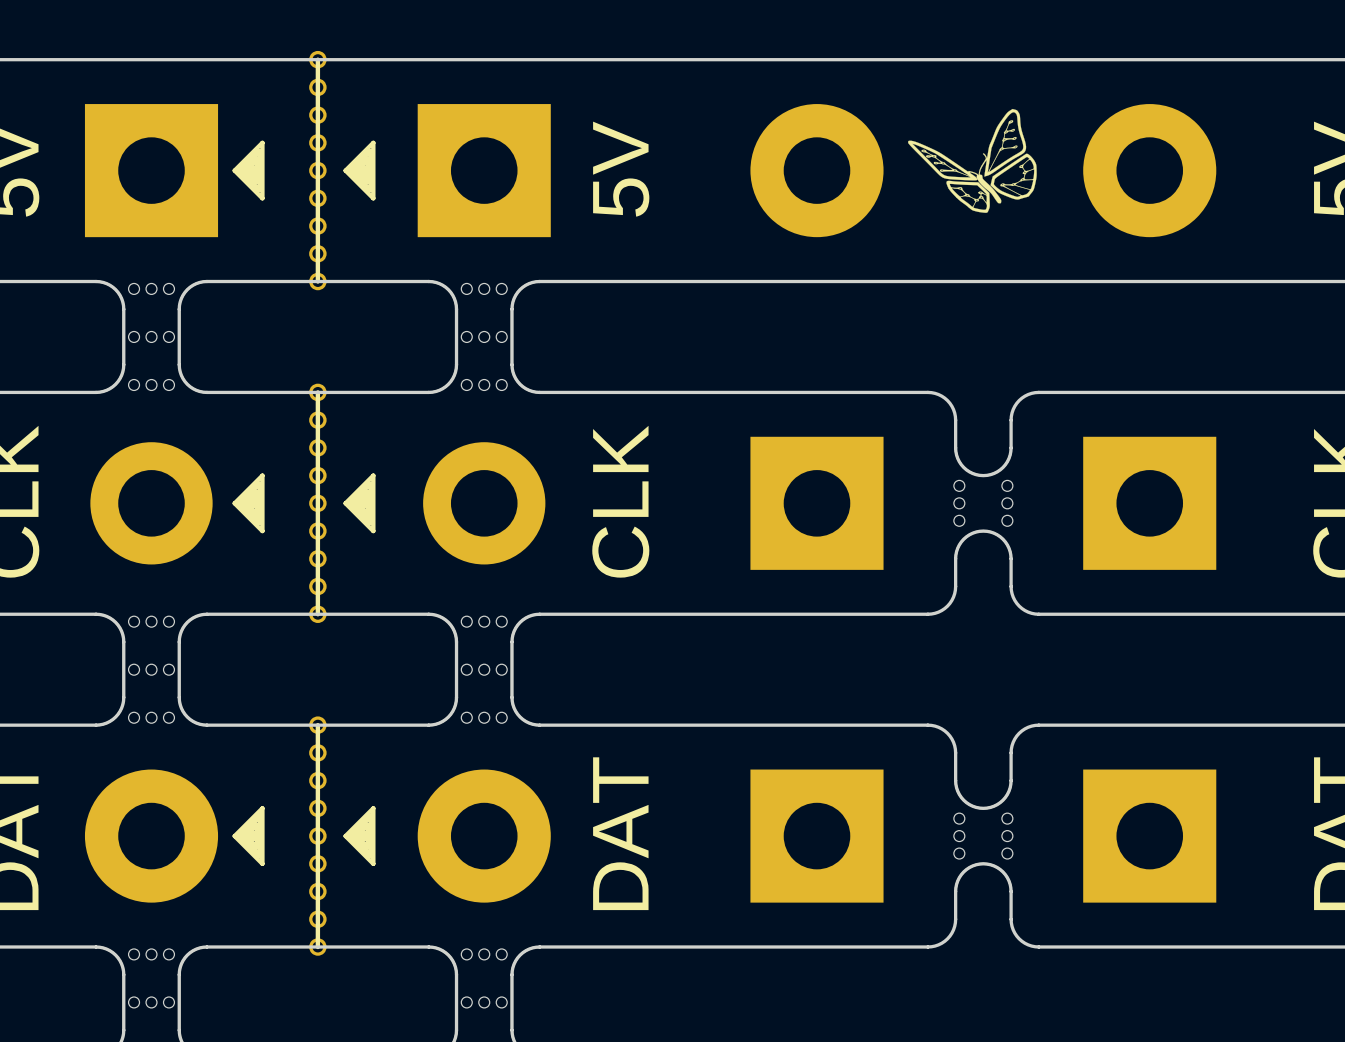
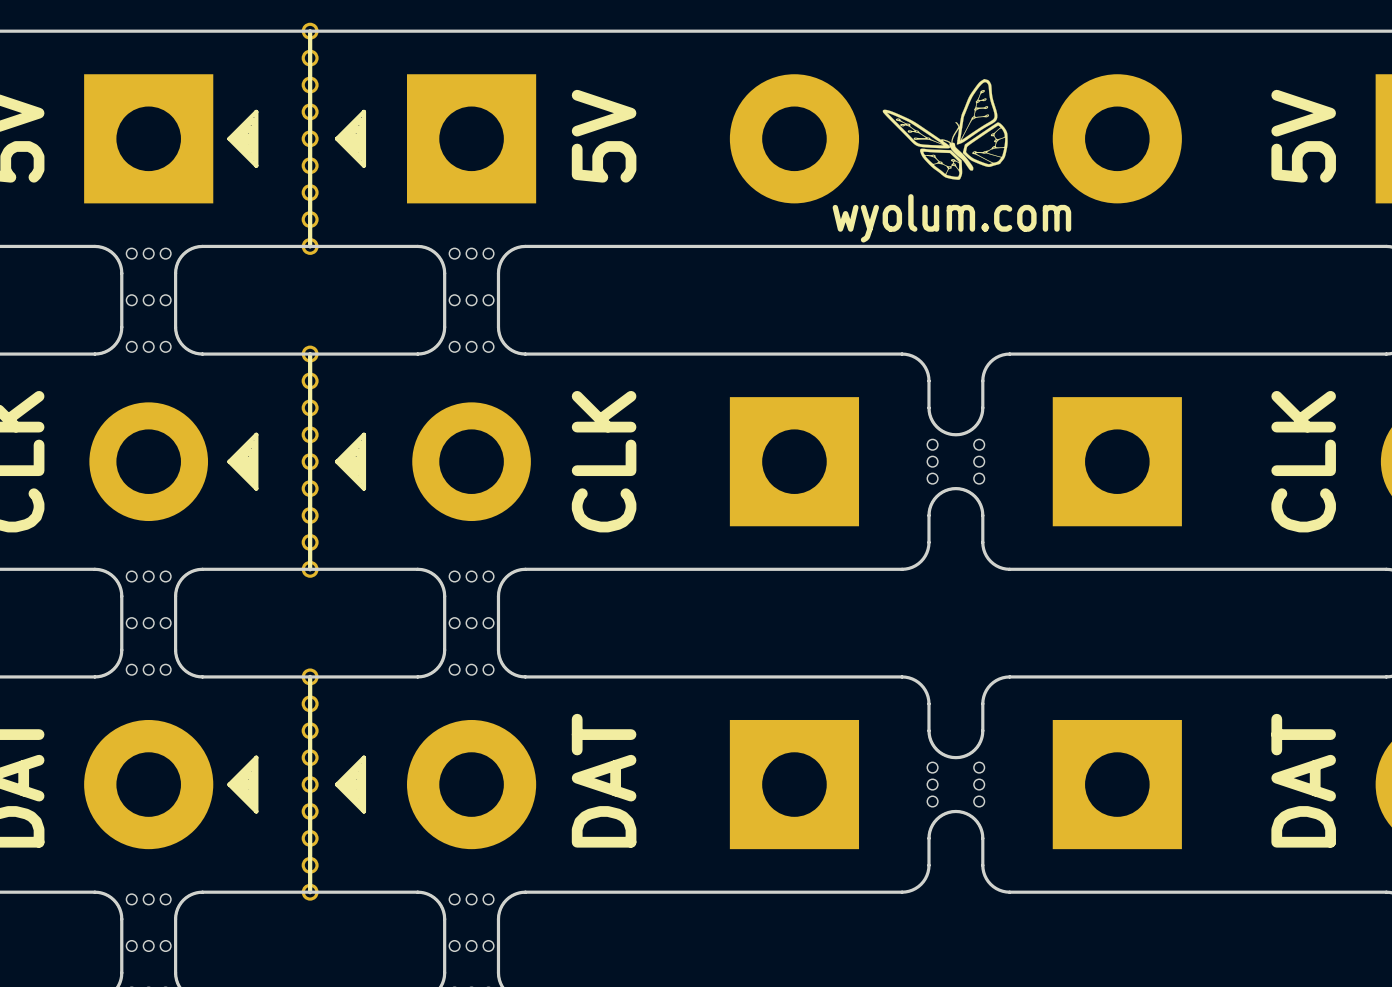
text: none -> wyolum.com (951, 218)

